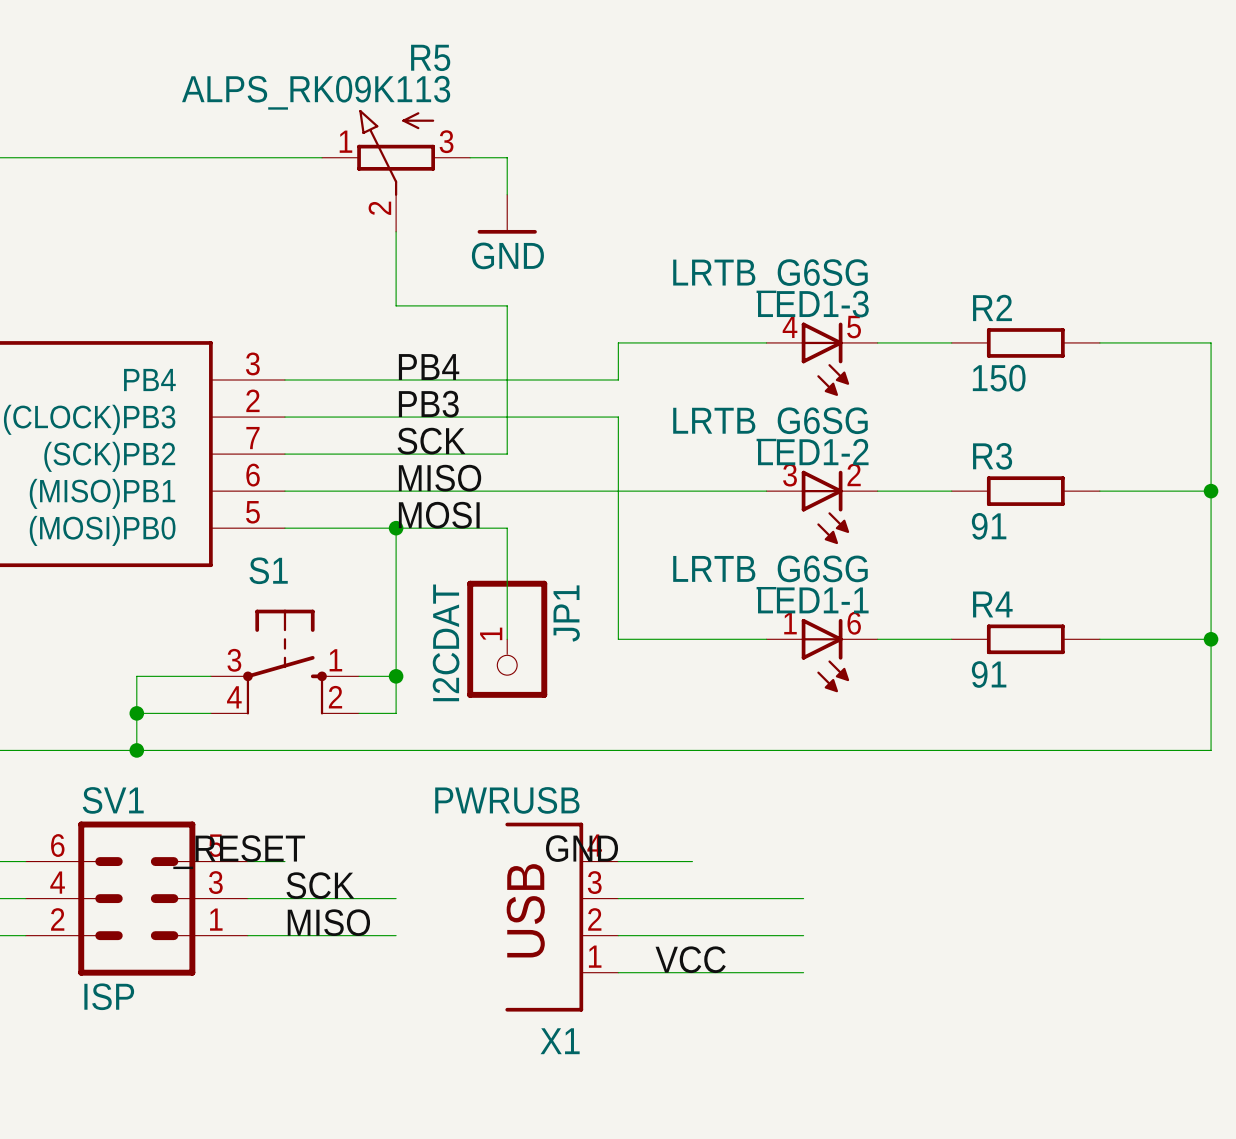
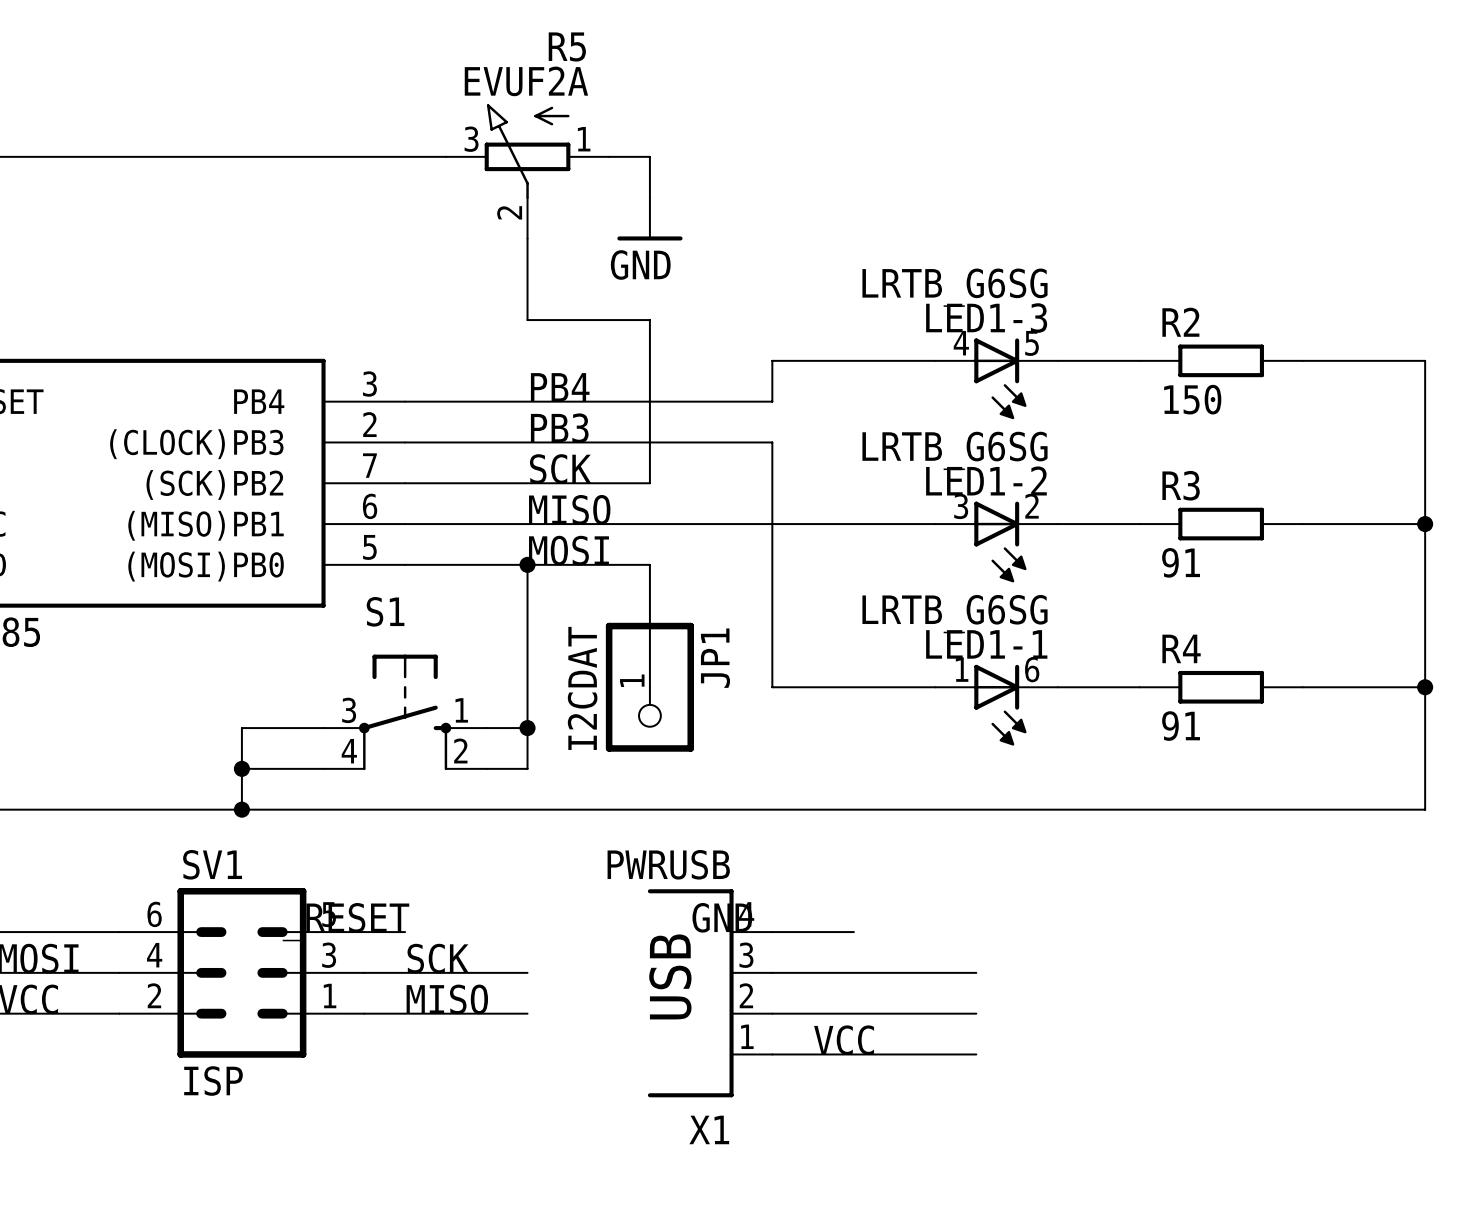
R5 value: ALPS_RK09K113 (316, 92) -> EVUF2A (526, 81)
R5 pin number: 1 (345, 141) -> 3 (471, 139)
R5 pin number: 3 (446, 141) -> 1 (584, 139)

